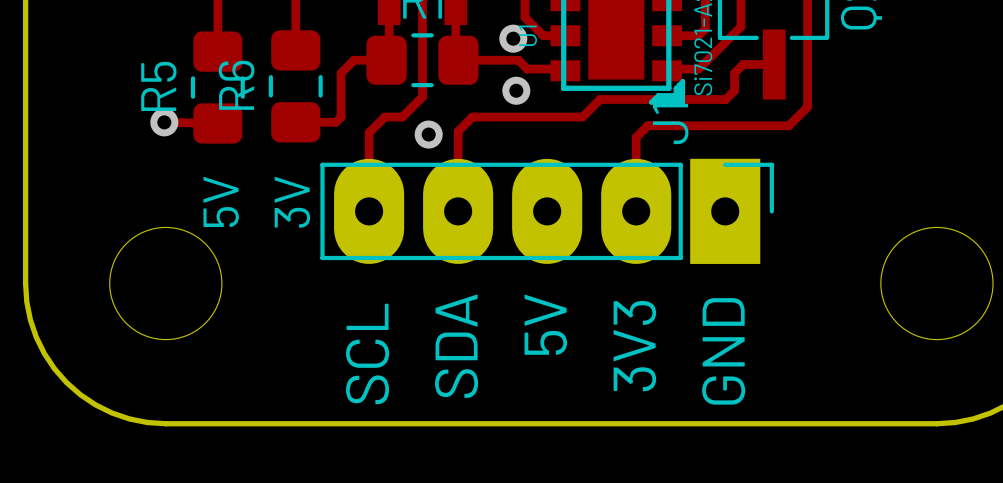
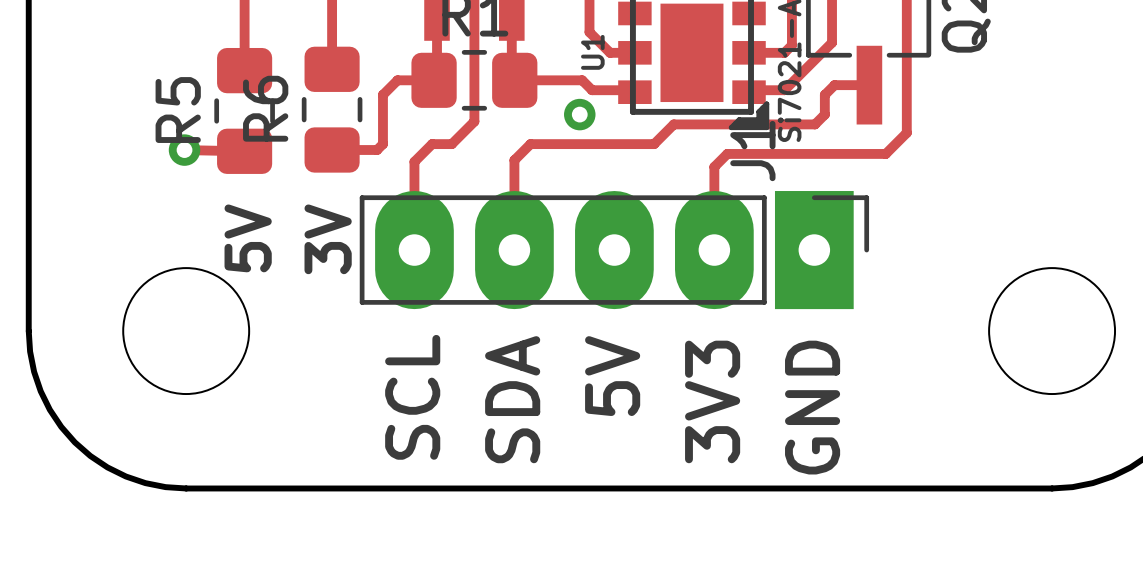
via: (513, 38) -> none
via: (428, 134) -> none

